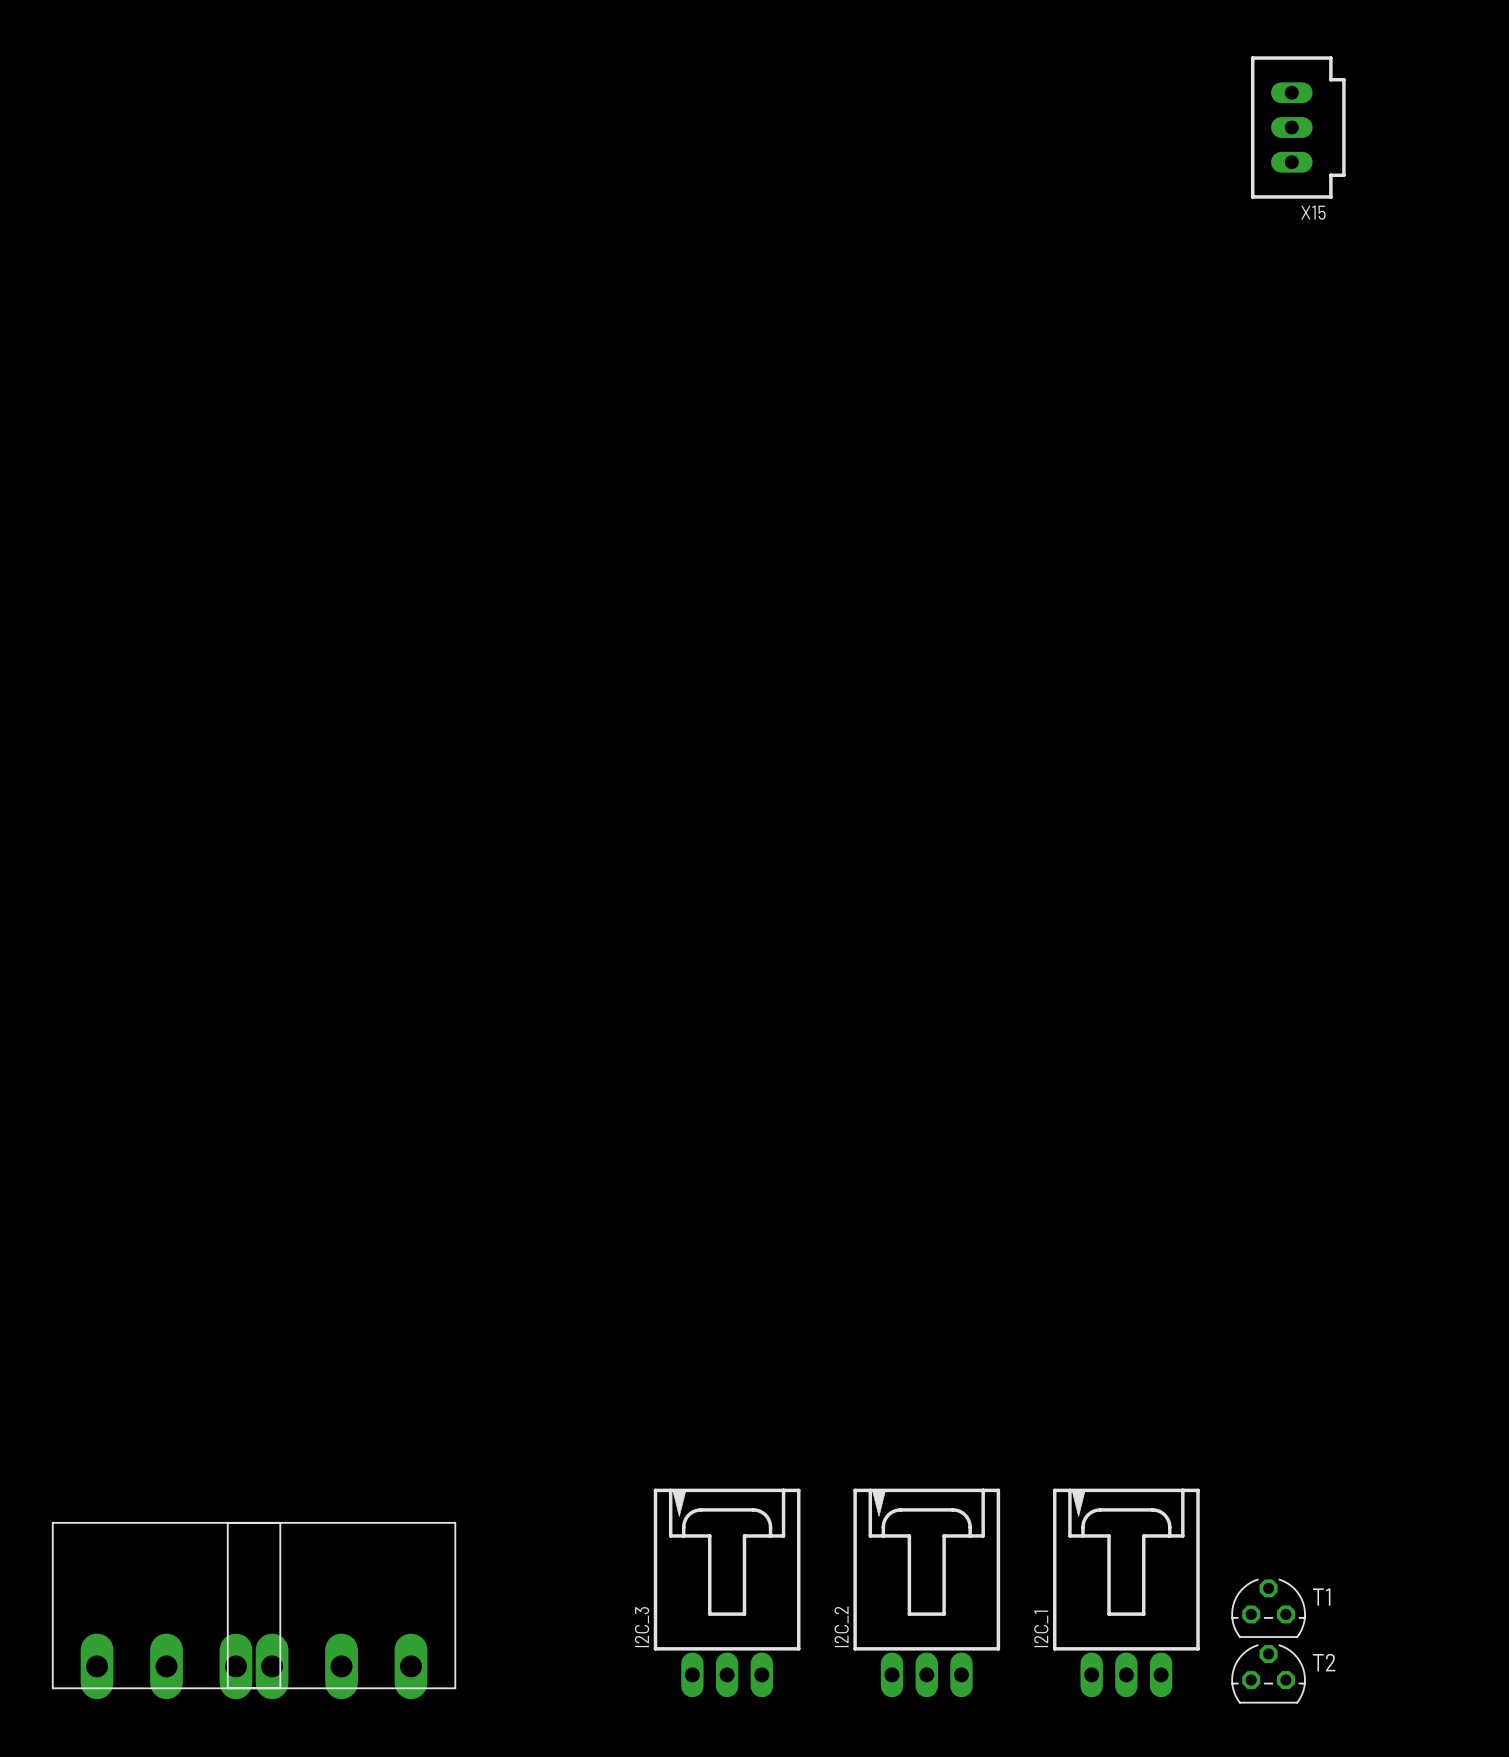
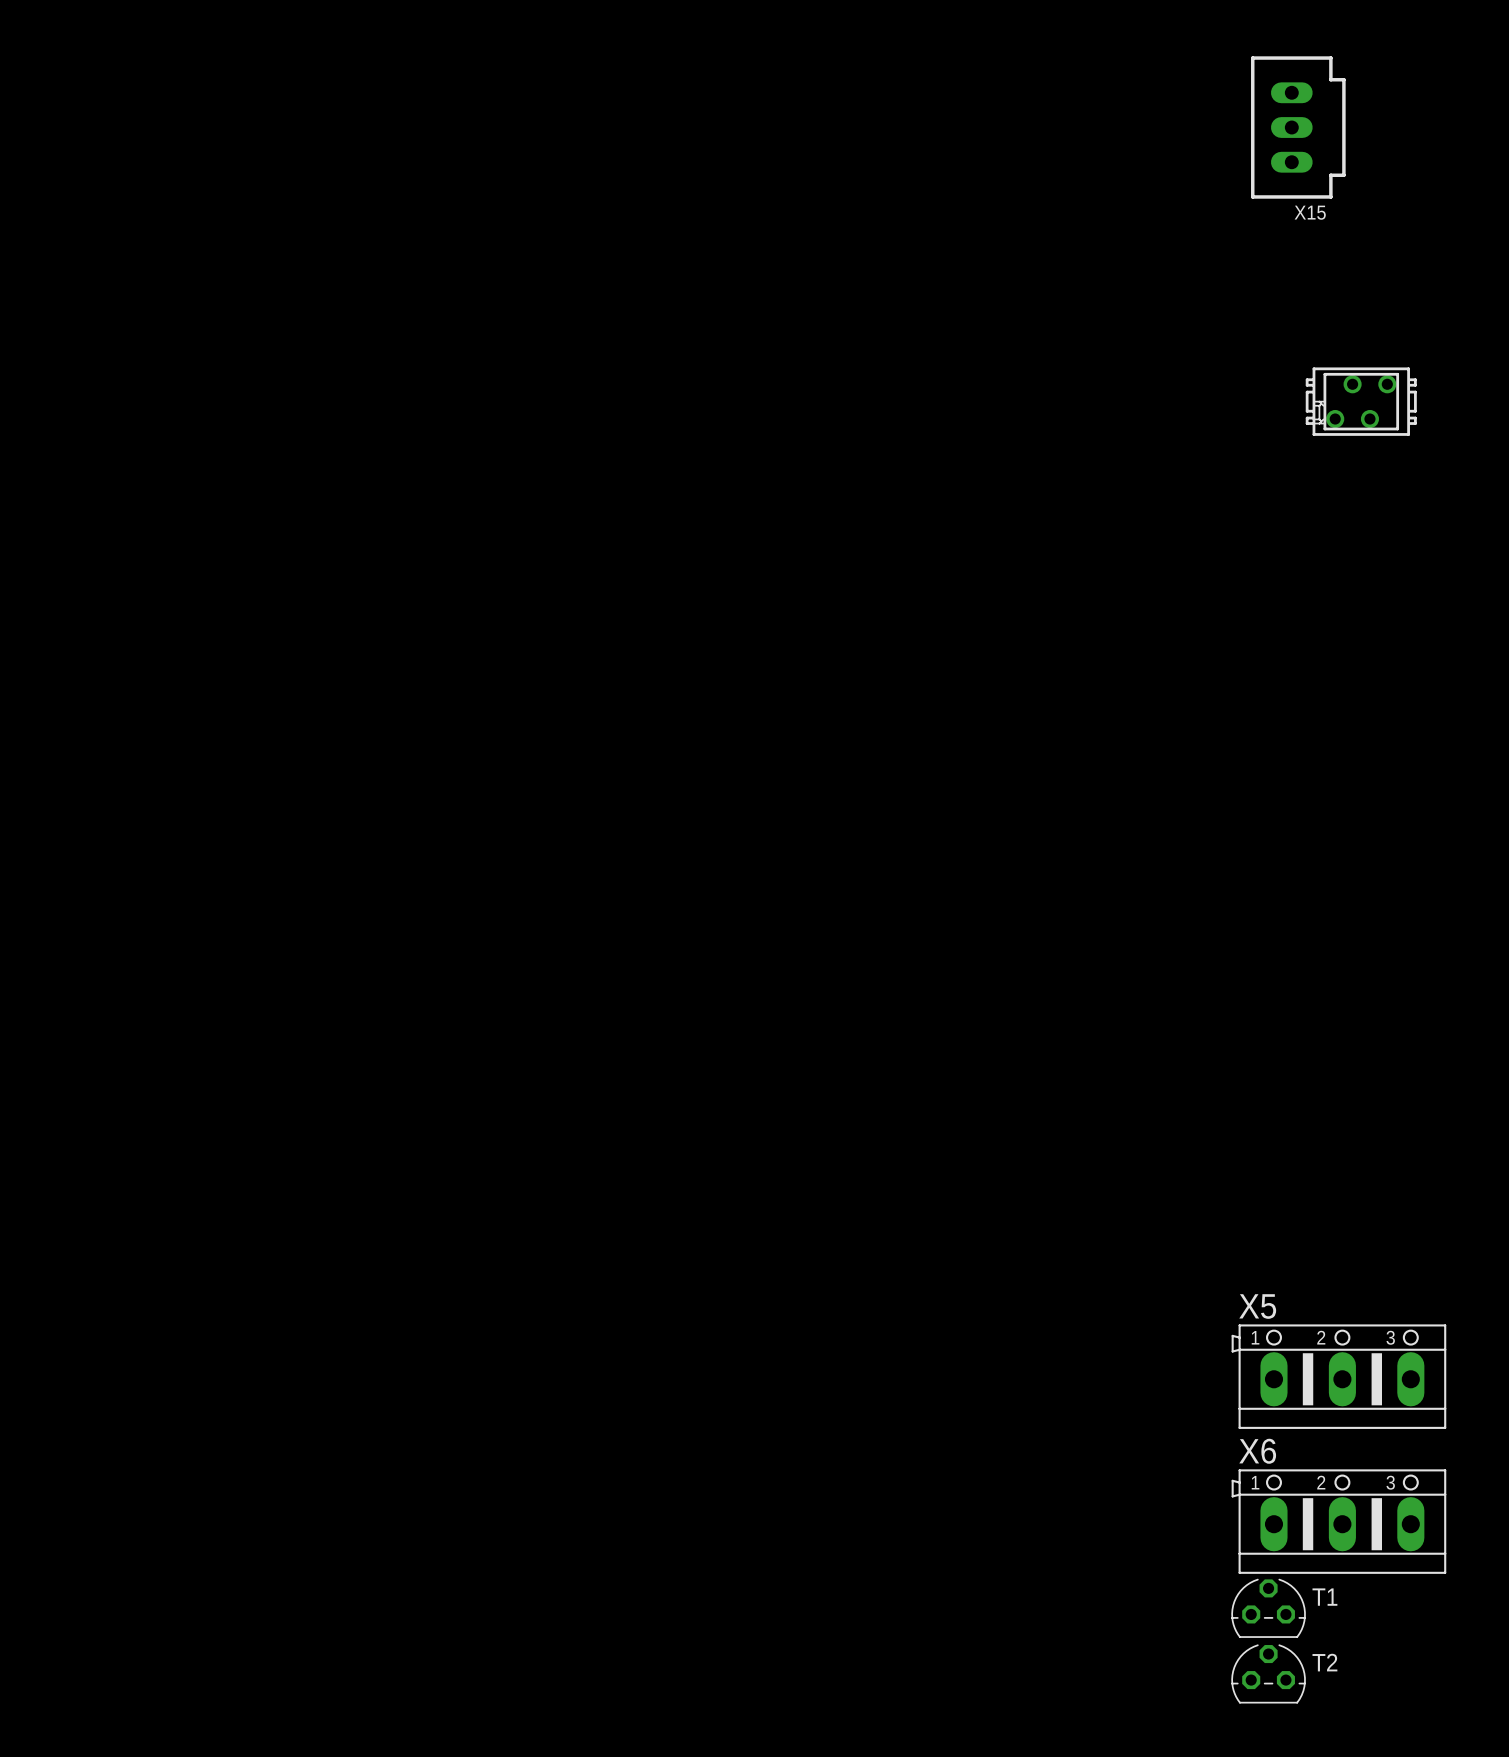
part: none -> (1361, 401)
X5: none -> (1338, 1376)
X6: none -> (1338, 1521)
I2C_3: (727, 1592) -> none
I2C_2: (926, 1592) -> none
I2C_1: (1126, 1592) -> none
part: (166, 1610) -> none
part: (341, 1610) -> none

